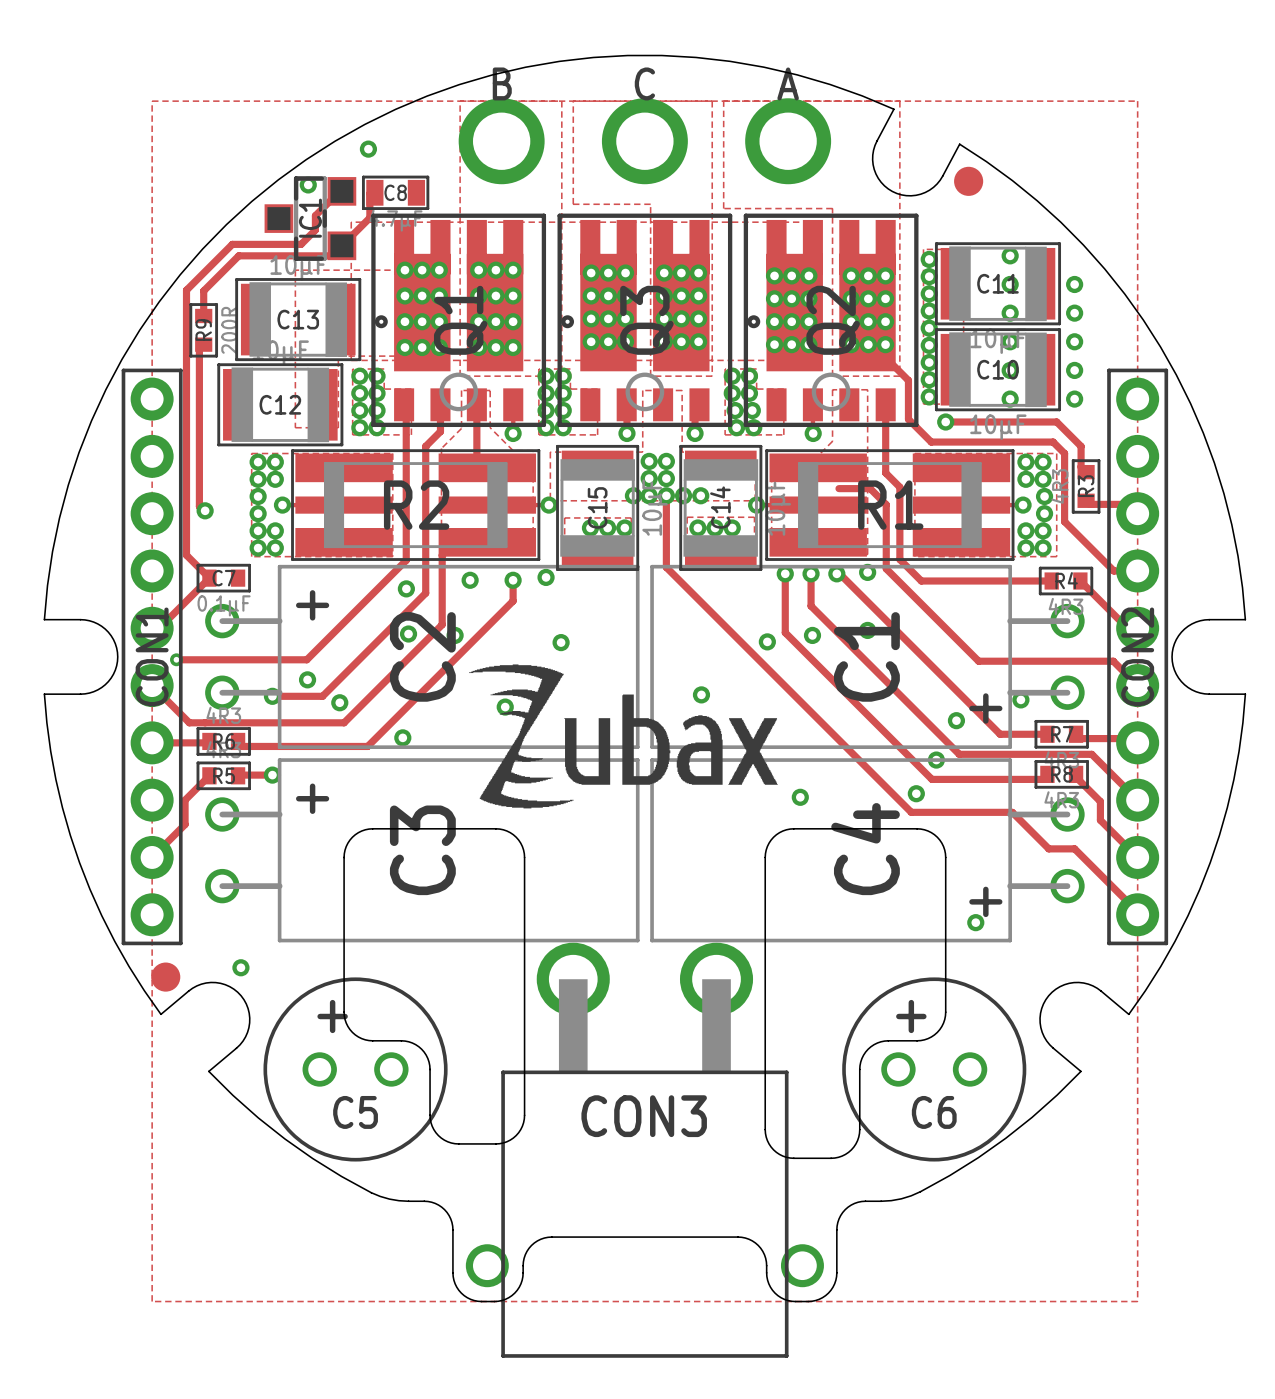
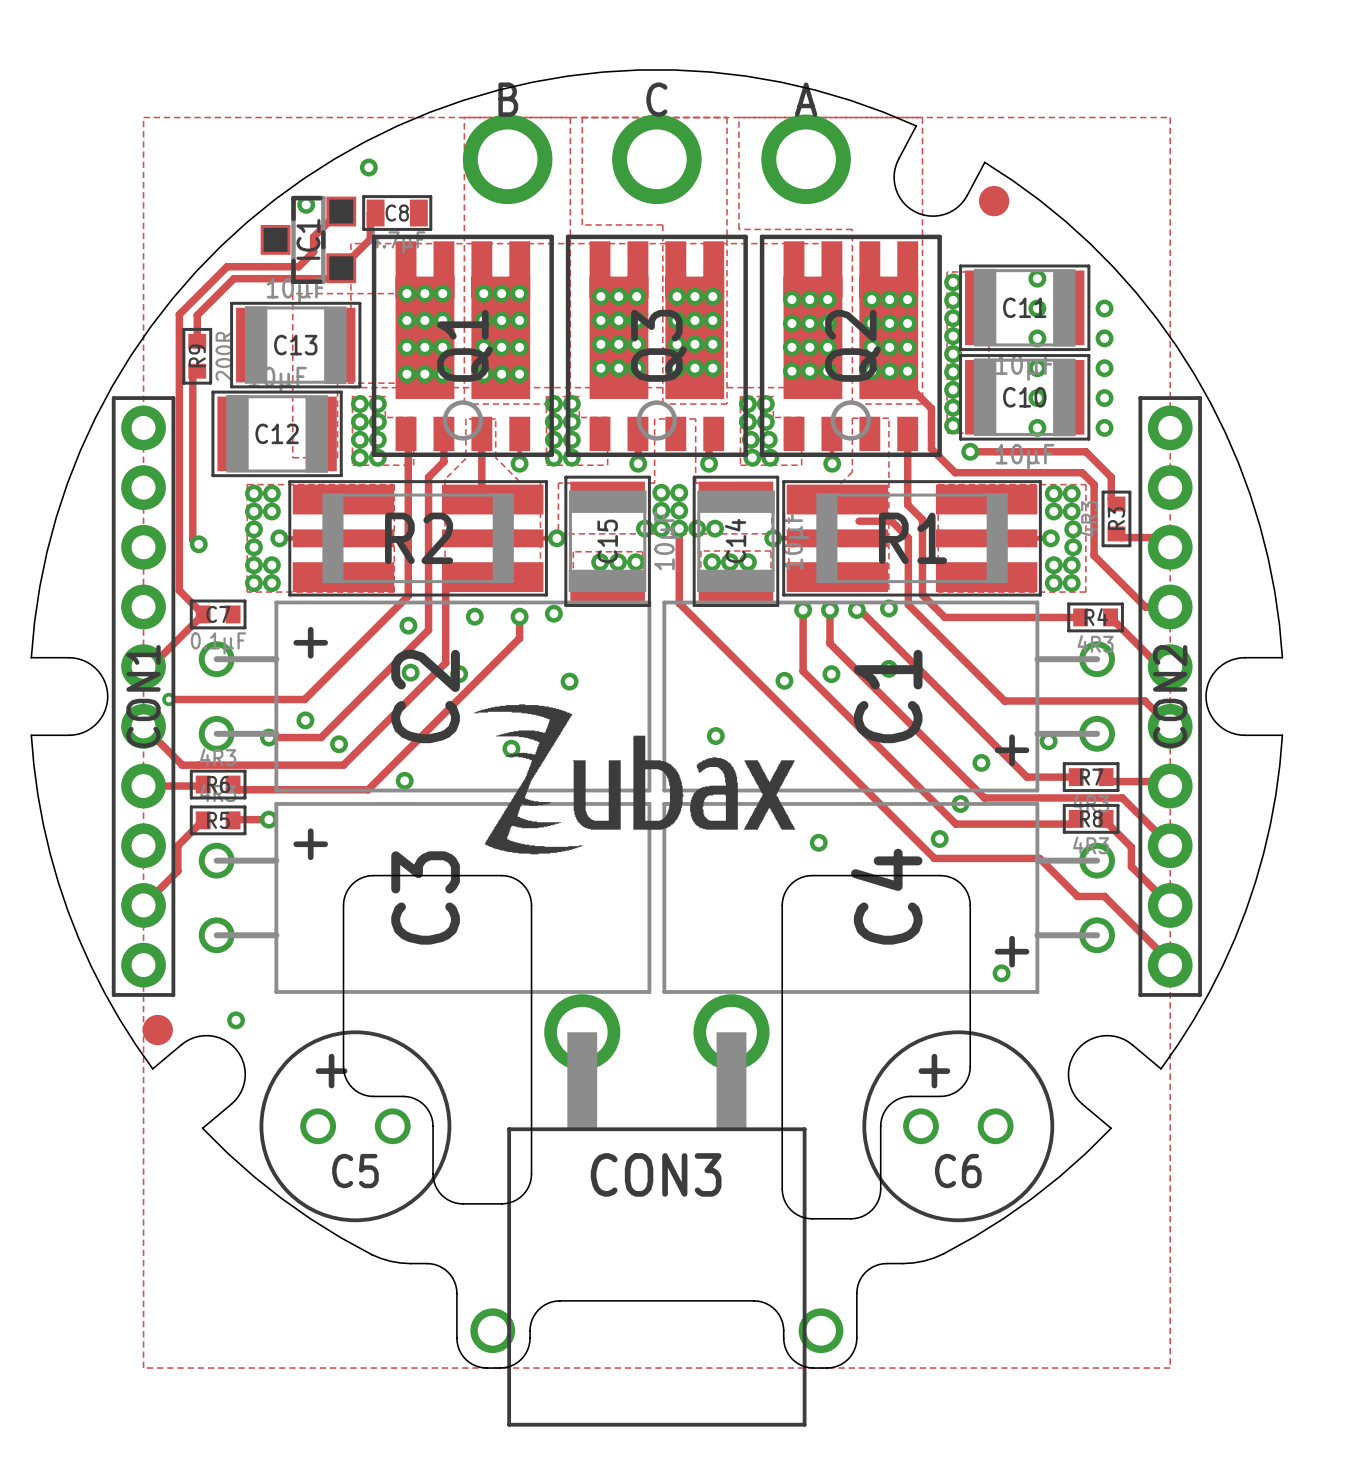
drawing: [374, 315, 388, 329] -> none
drawing: [561, 315, 575, 329] -> none
drawing: [747, 315, 761, 329] -> none

